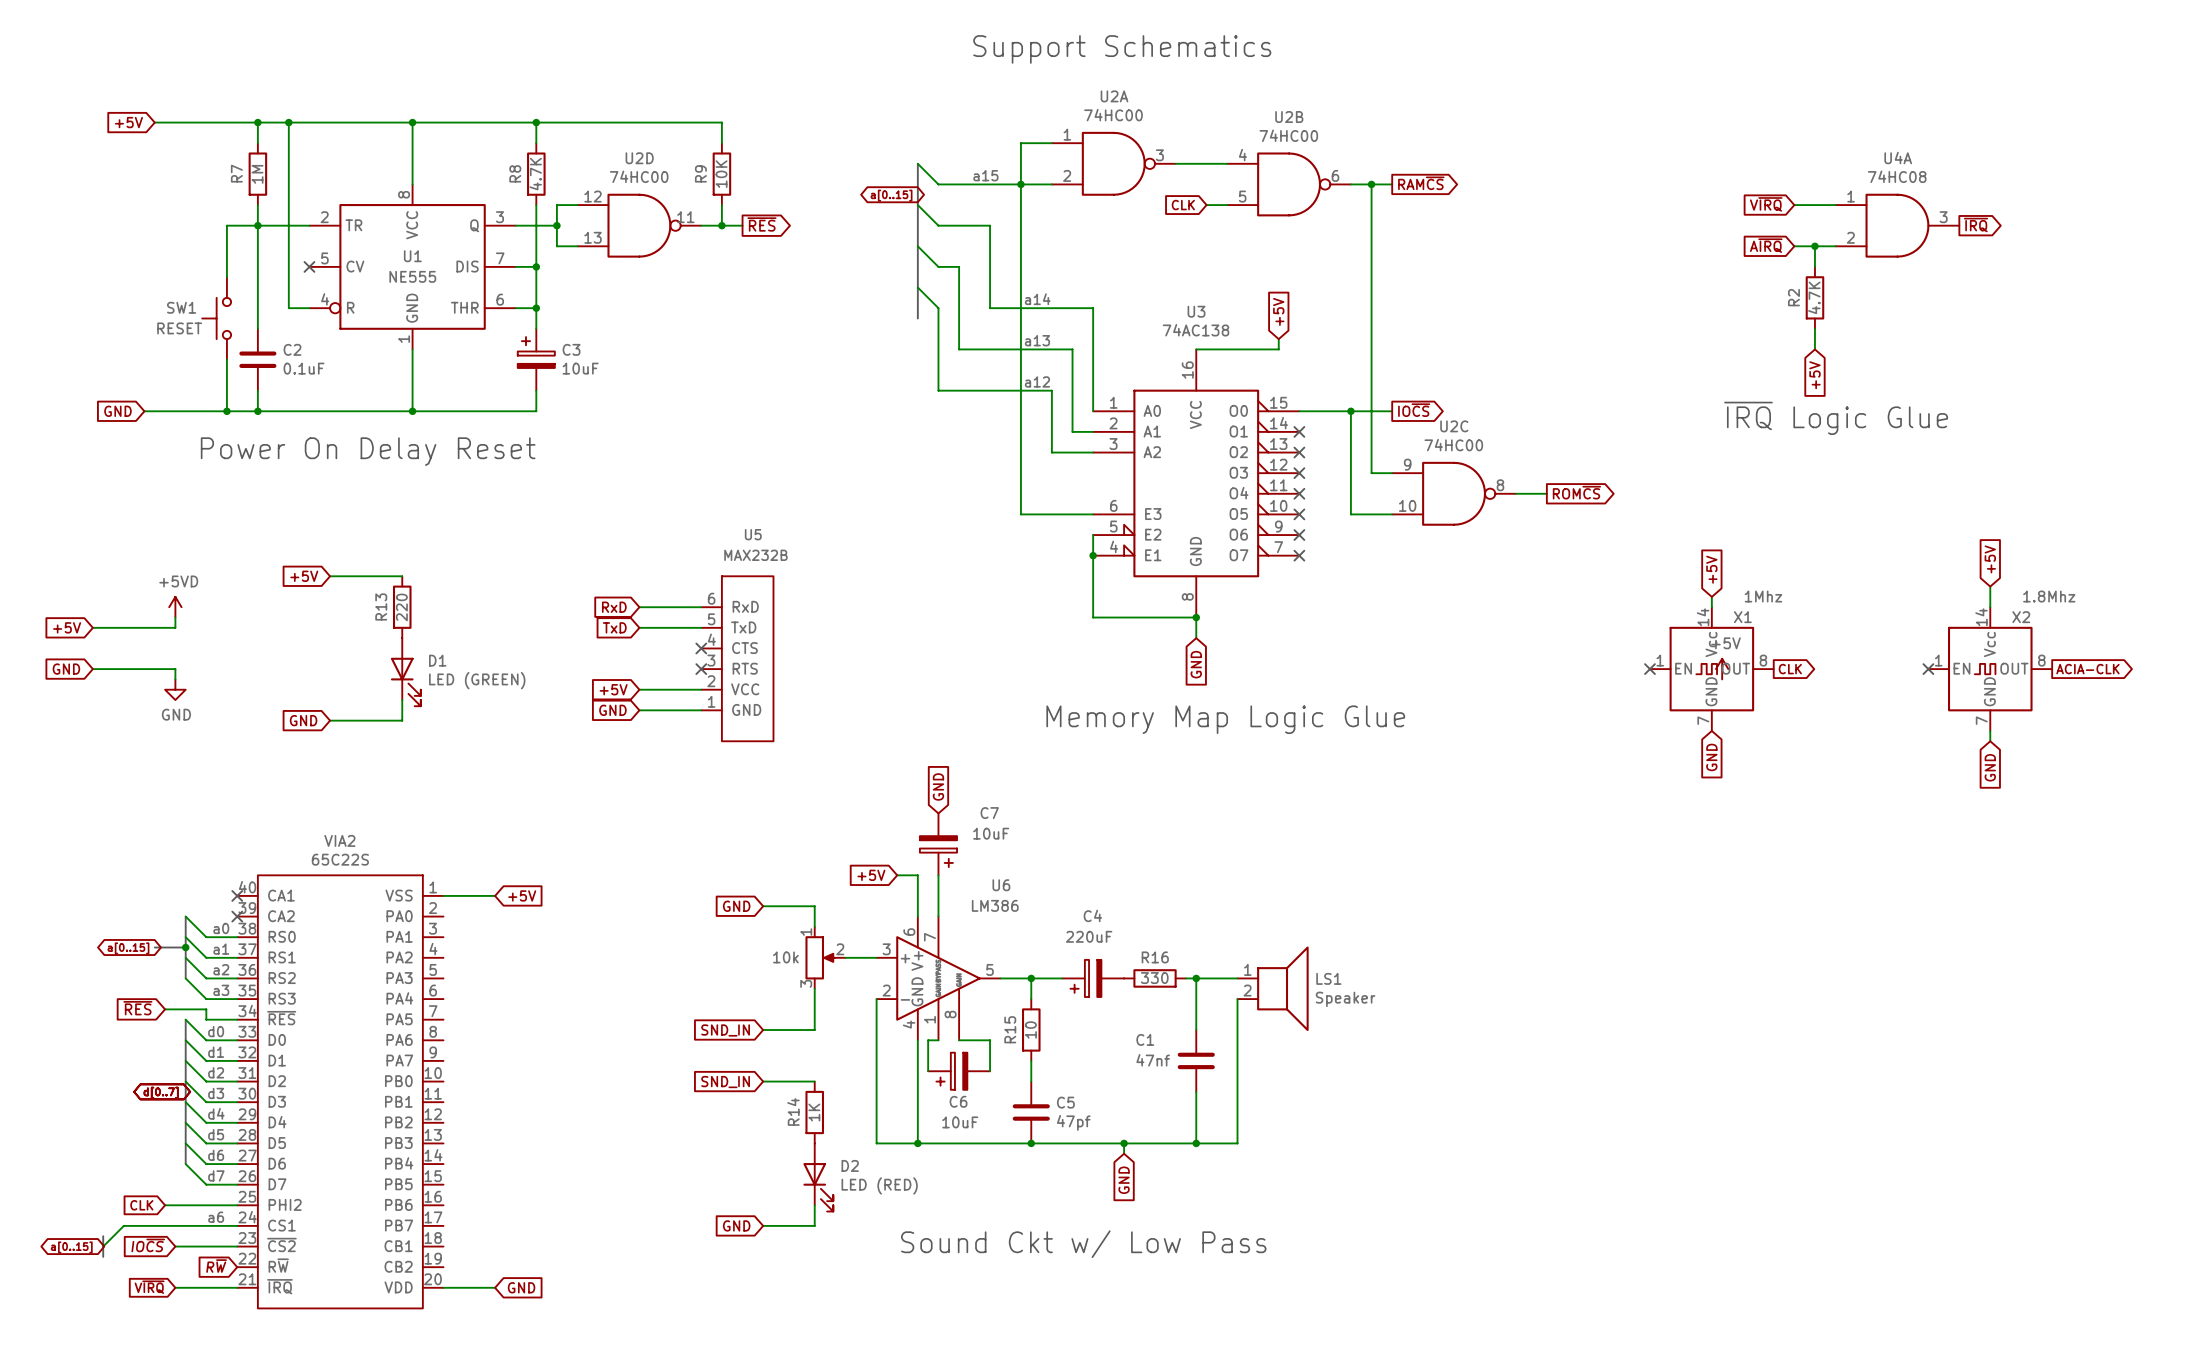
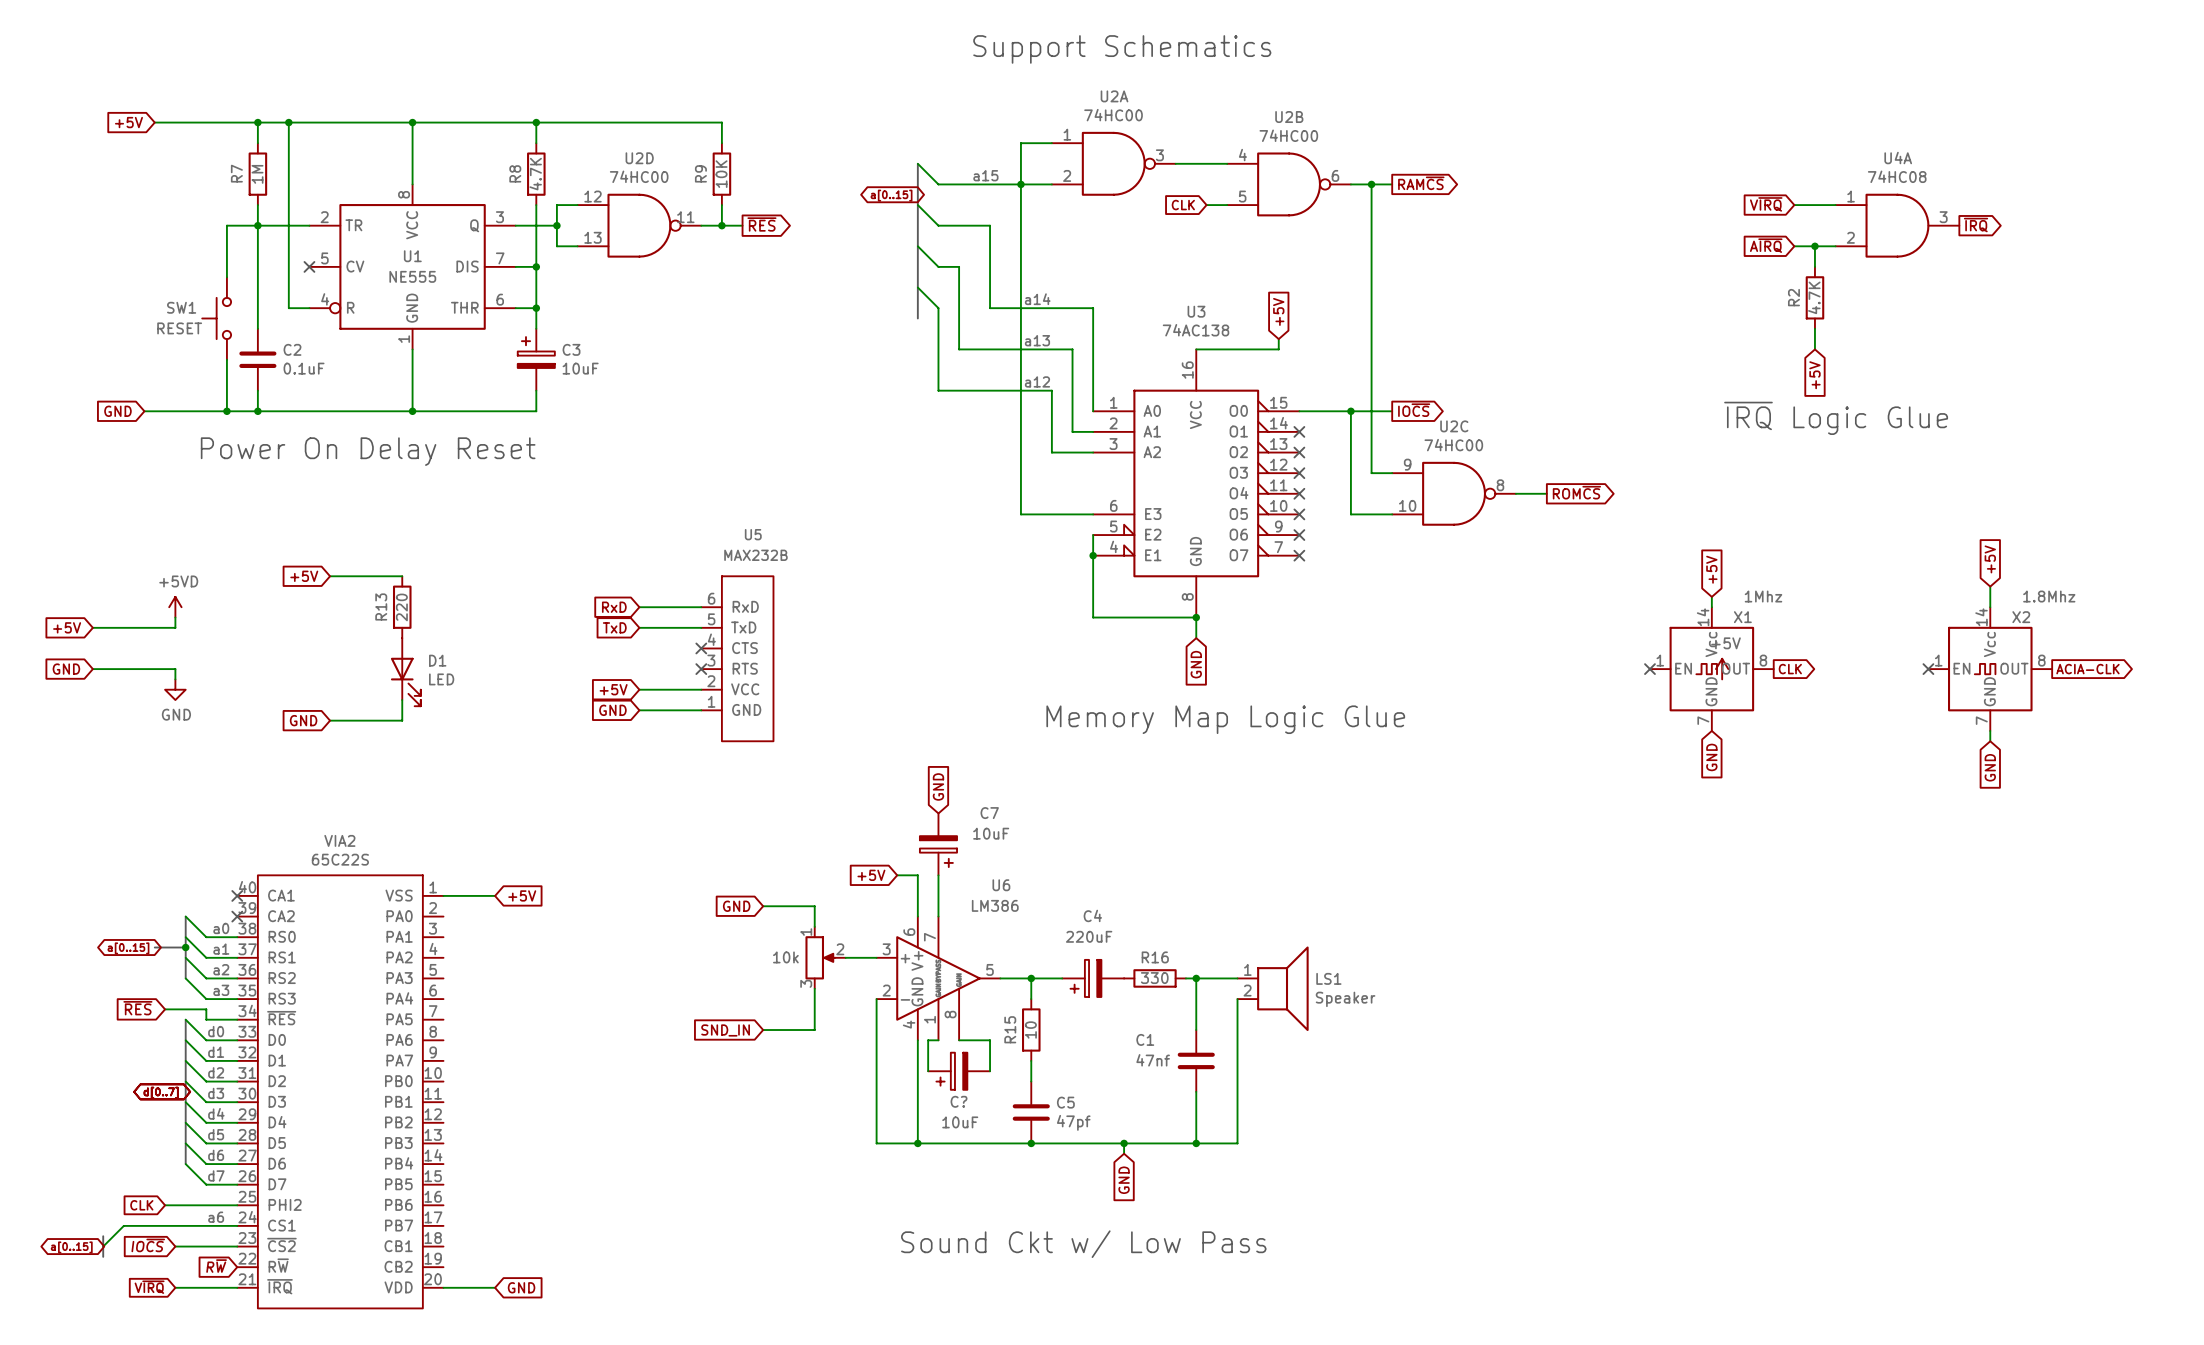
D1 value: LED (GREEN) (477, 680) -> LED (441, 679)
wire: (763, 1081) (814, 1081) -> none
global label: SND_IN (725, 1082) -> none
C6 name: C6 (958, 1101) -> C? (959, 1101)
R14: 1K (814, 1112) -> none
D2: LED (RED) (818, 1177) -> none
wire: (814, 1205) (814, 1225) (763, 1225) -> none
global label: GND (736, 1225) -> none

